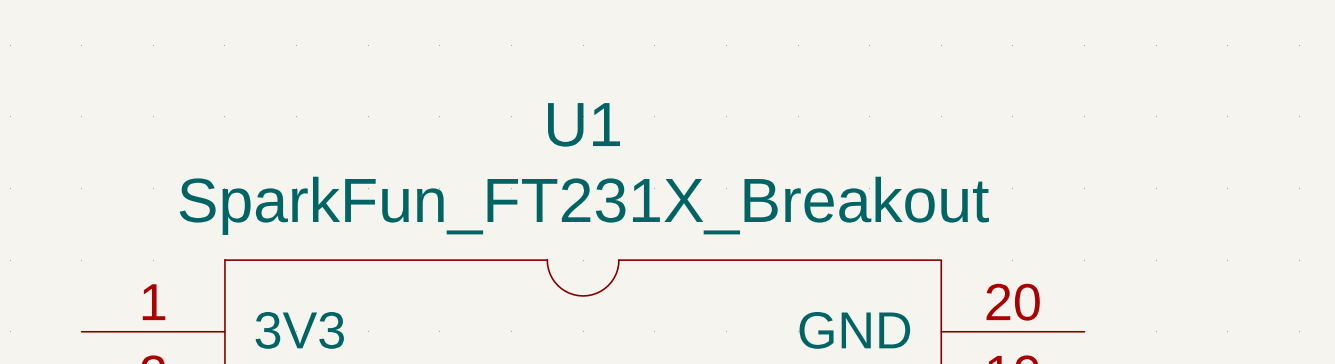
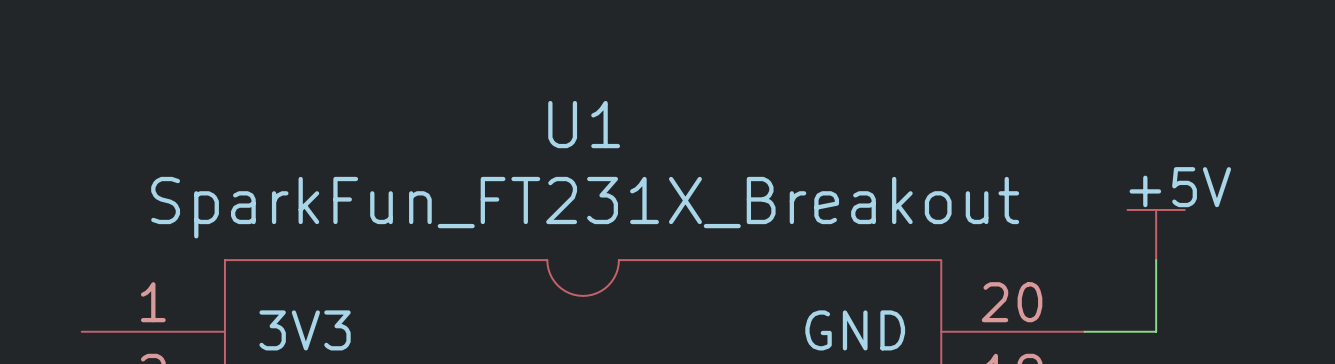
power symbol: none -> +5V (1156, 235)
wire: none -> (1156, 260) (1156, 331) (1084, 331)

